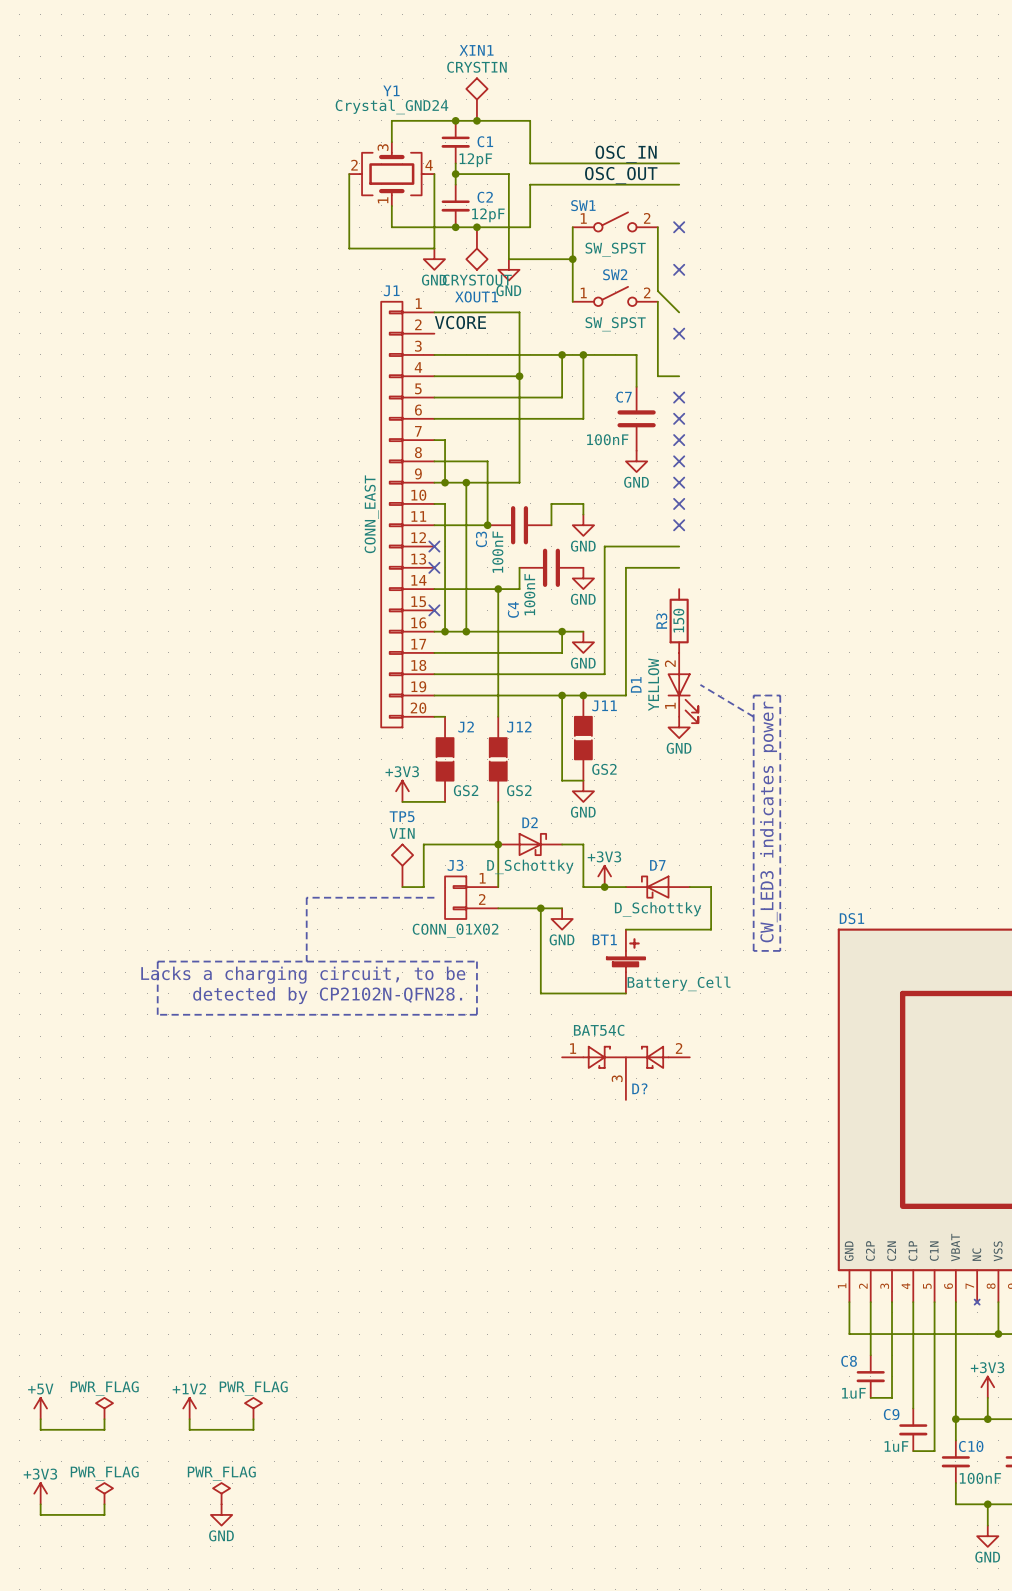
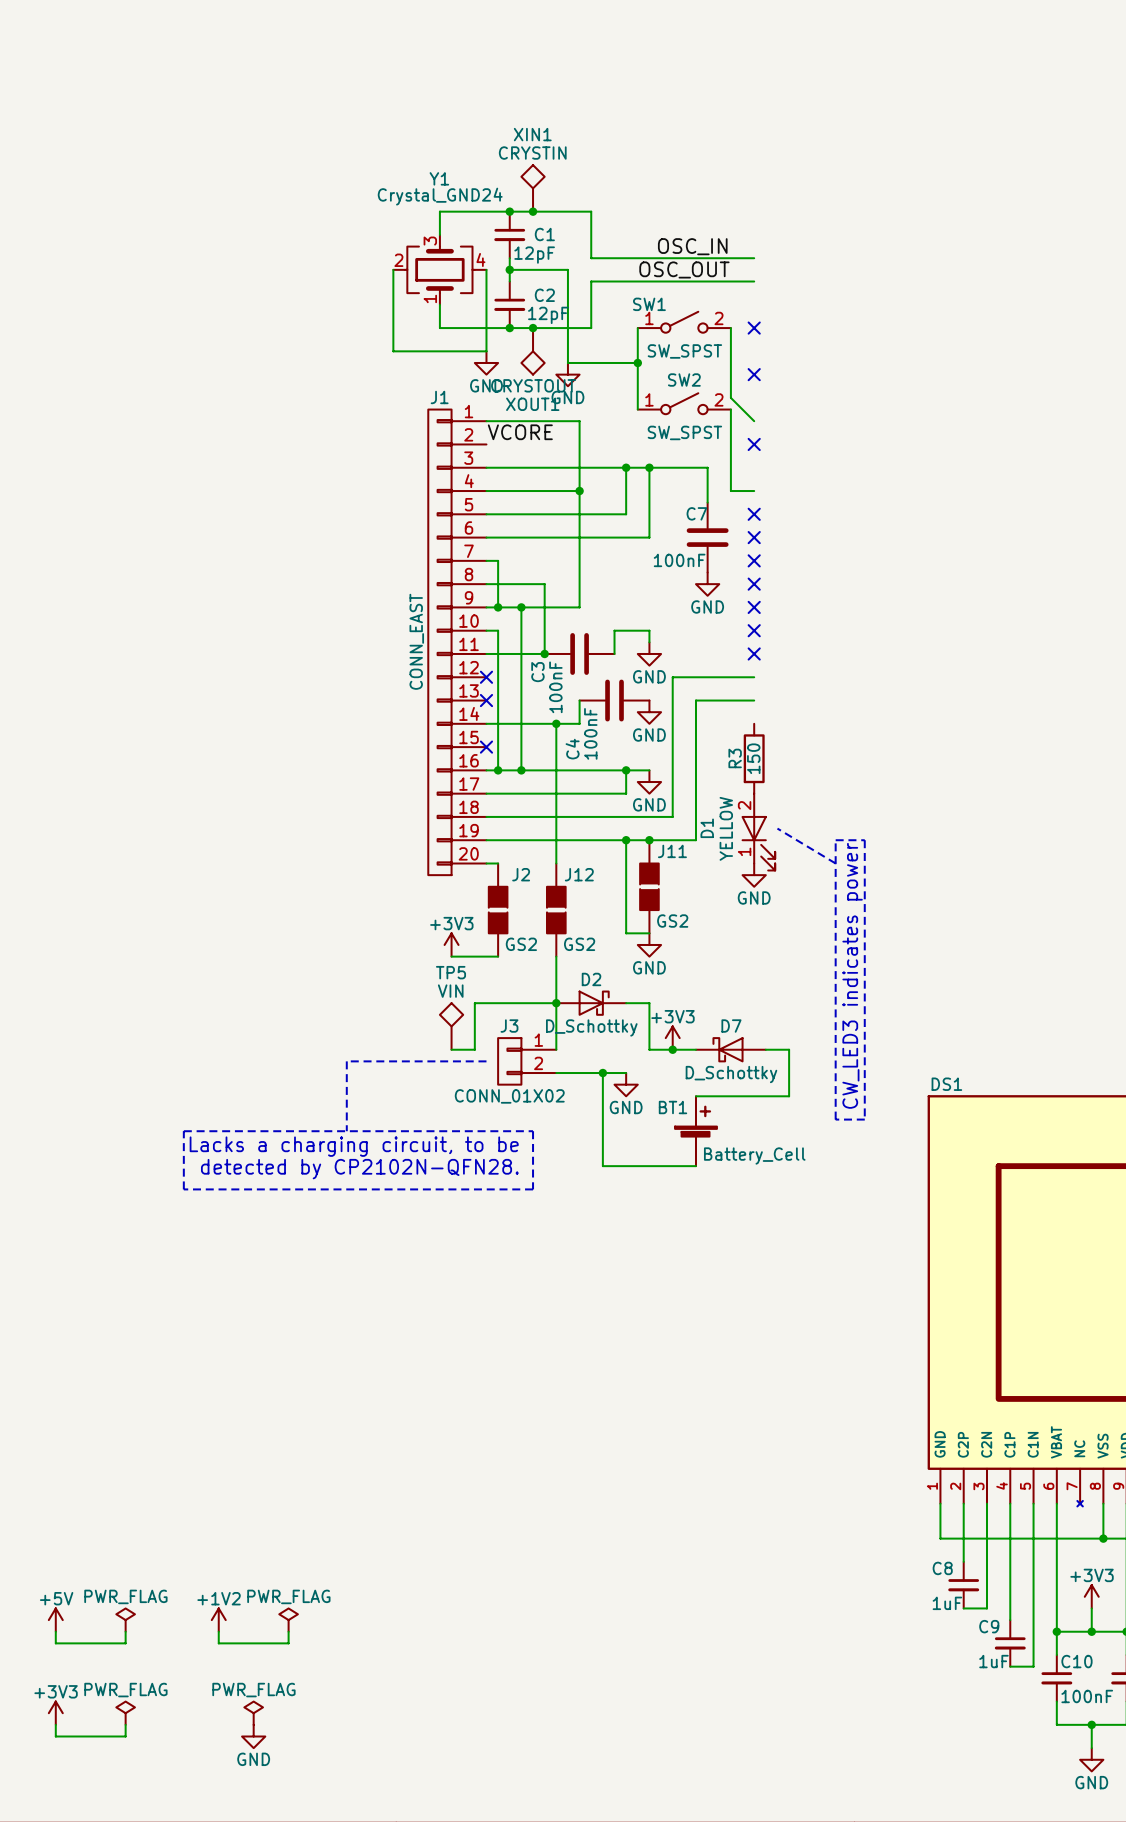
D?: BAT54C (625, 1073) -> none

